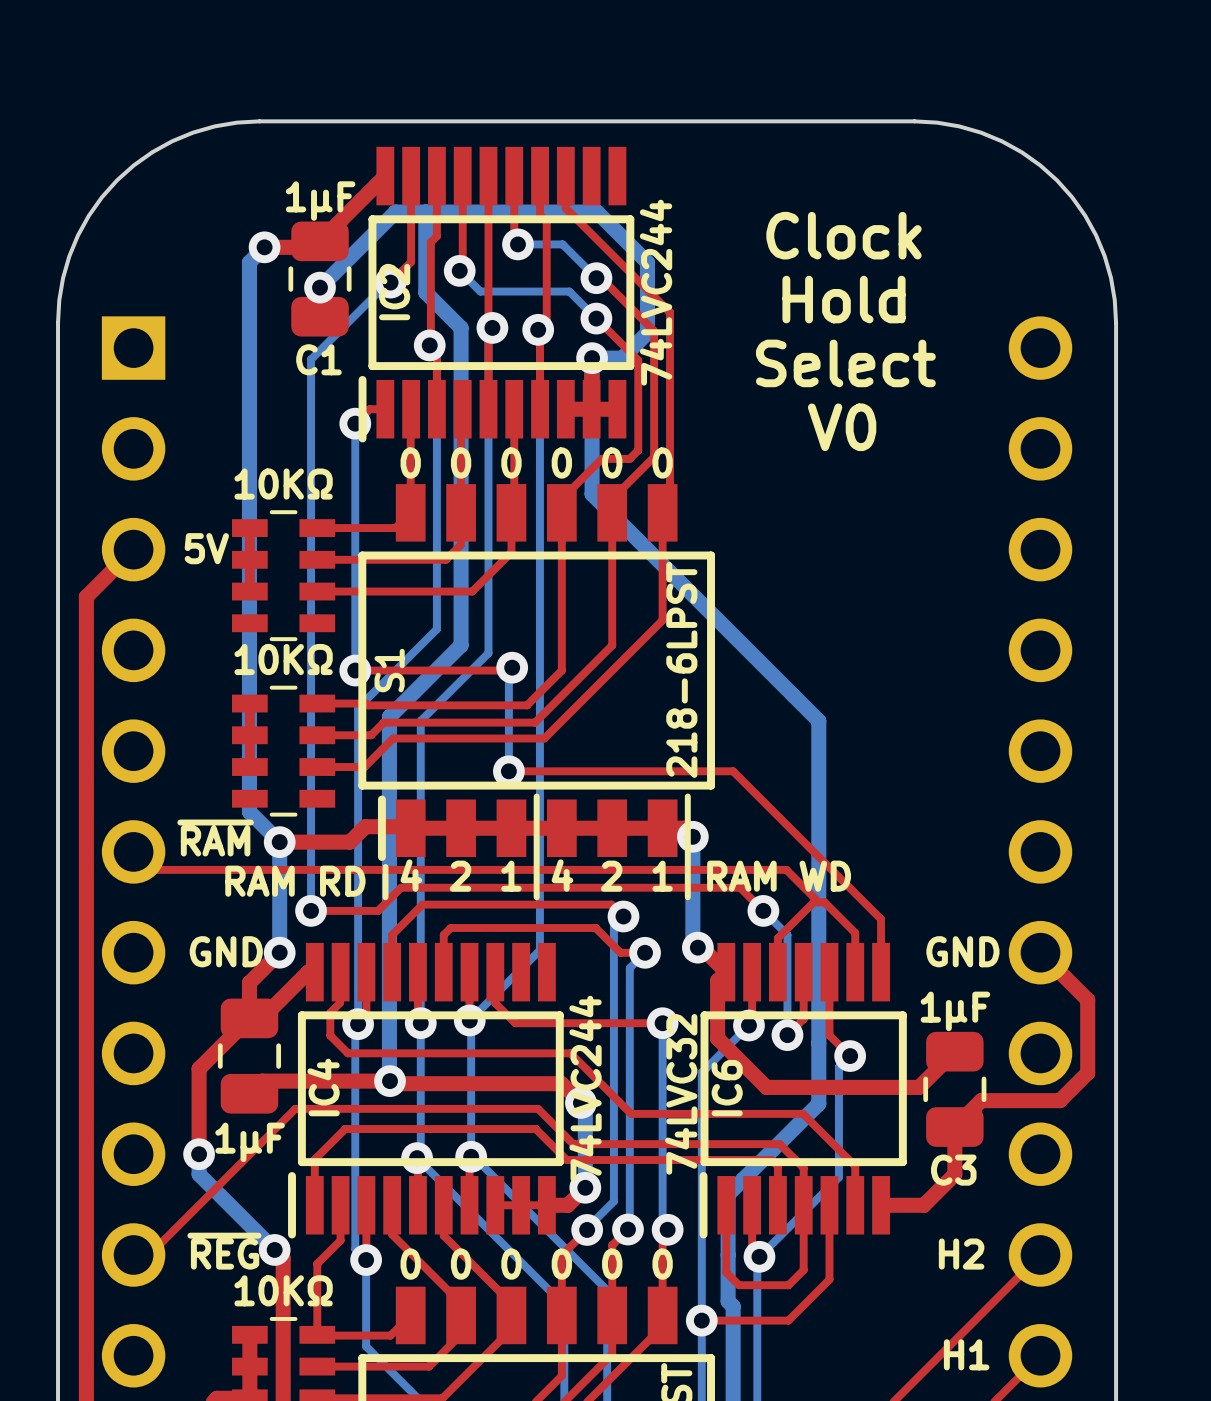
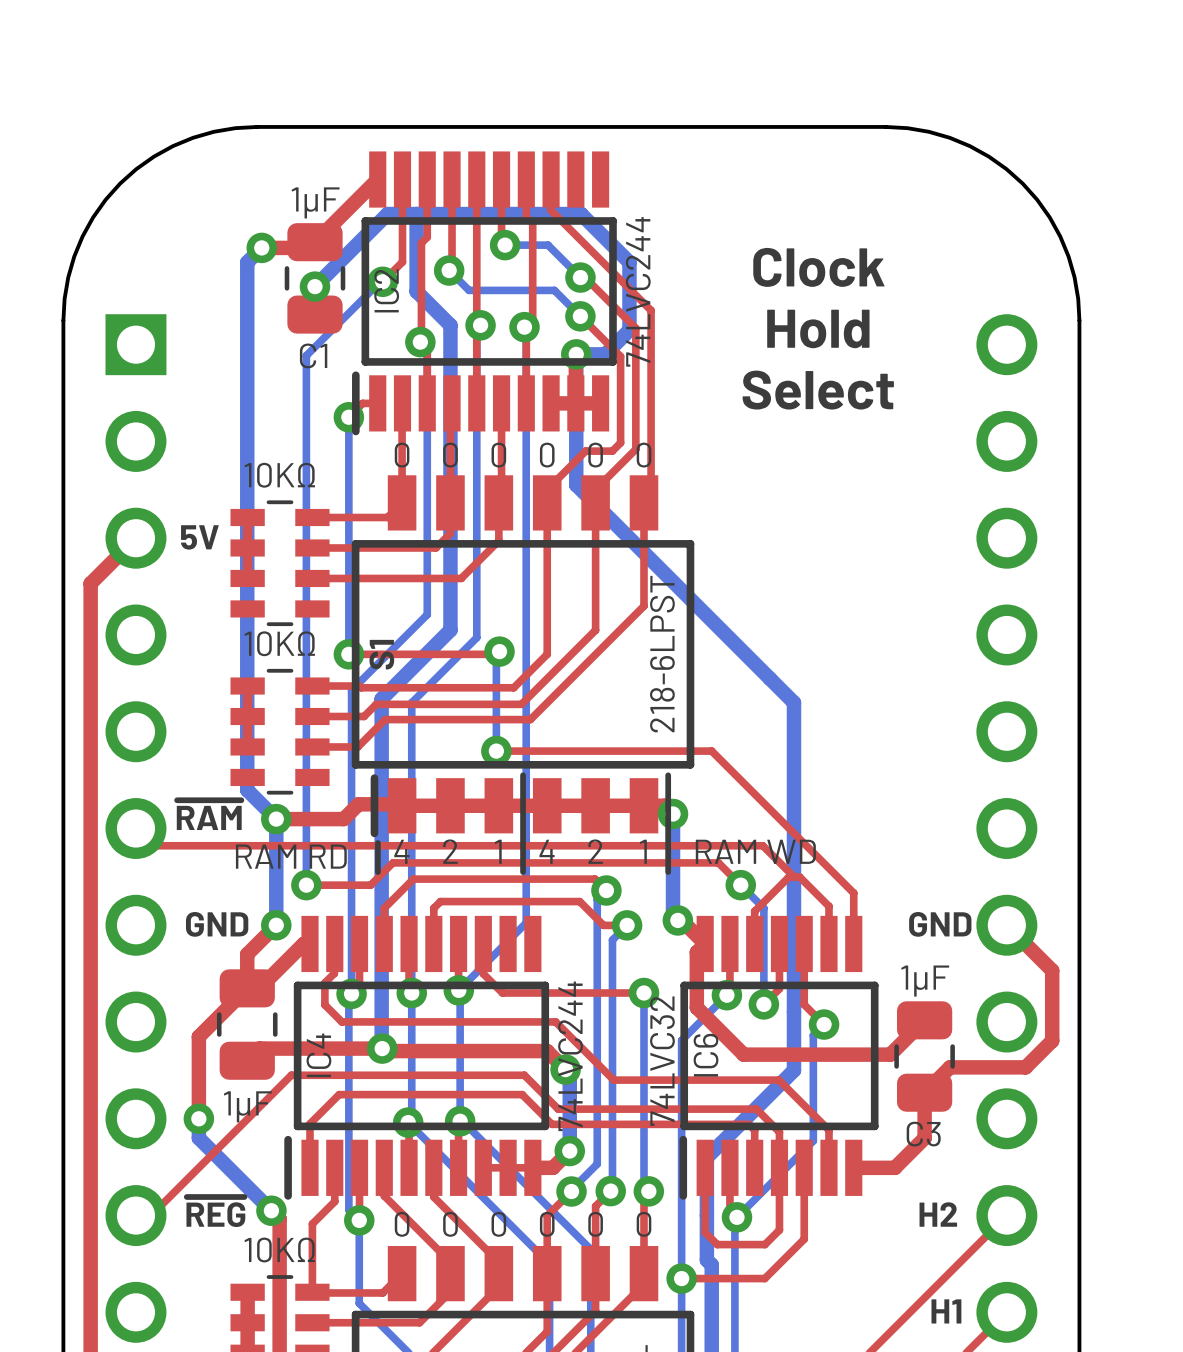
text position: Clock (844, 235) -> Clock (818, 267)
text position: Hold (844, 299) -> Hold (818, 328)
text position: Select (845, 363) -> Select (818, 390)
text: V0 (842, 427) -> none

